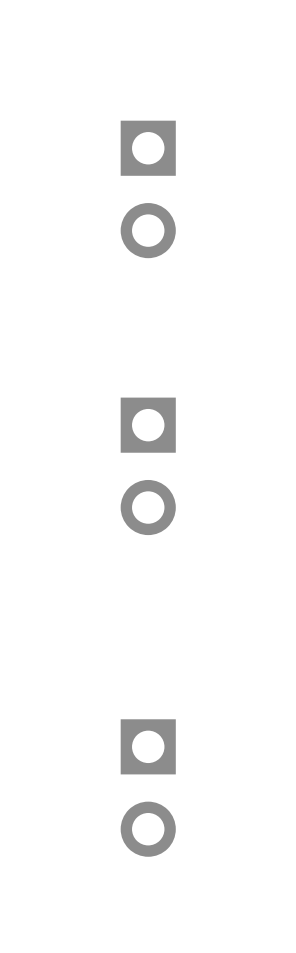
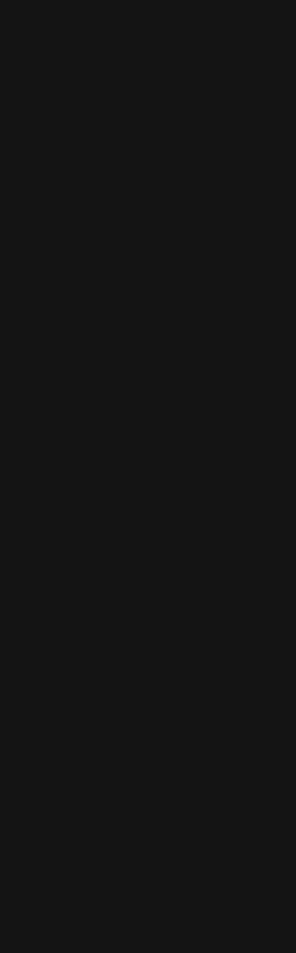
part: (148, 189) -> none
part: (148, 466) -> none
part: (148, 788) -> none

